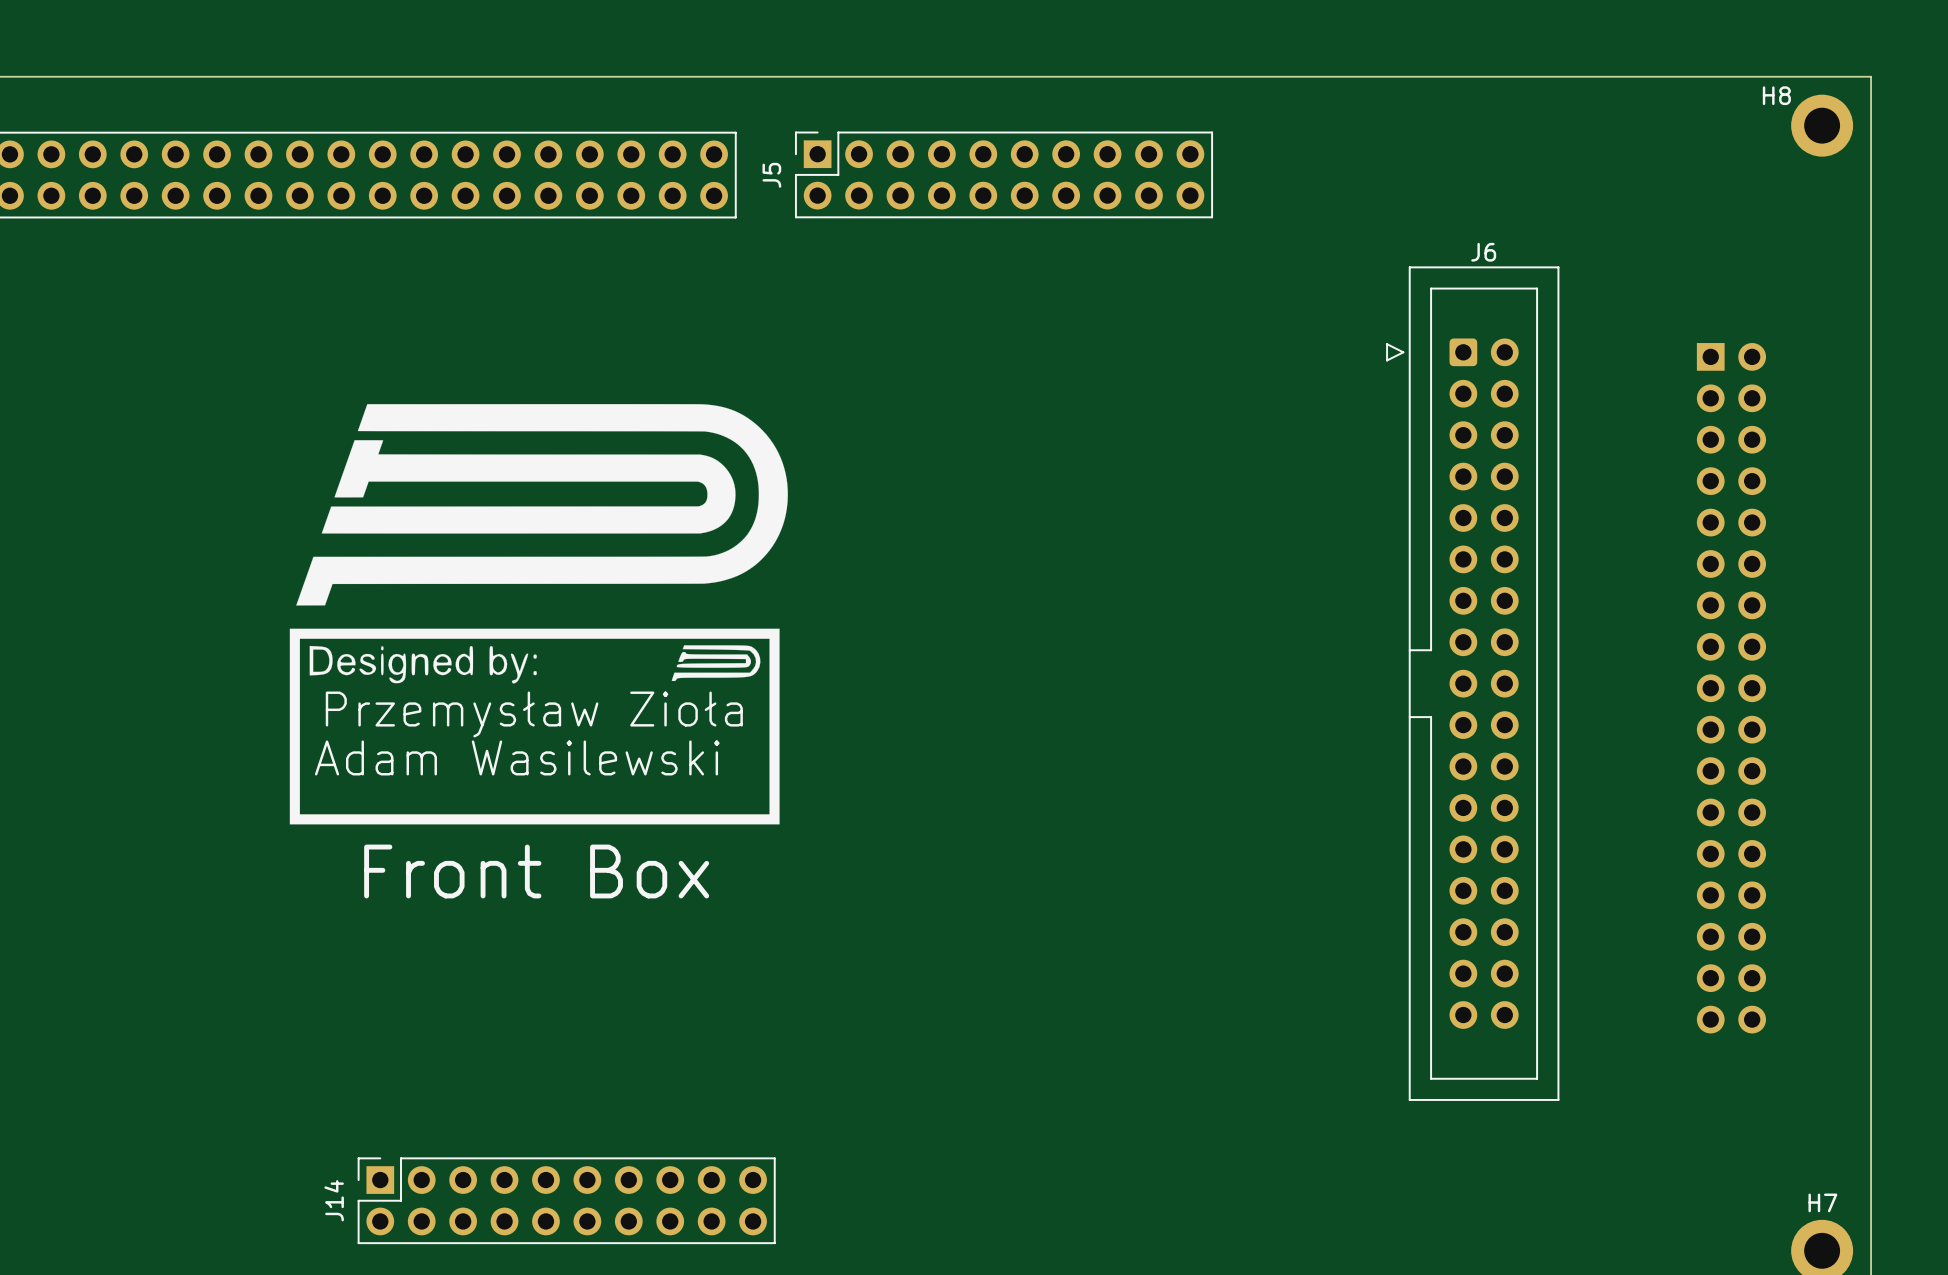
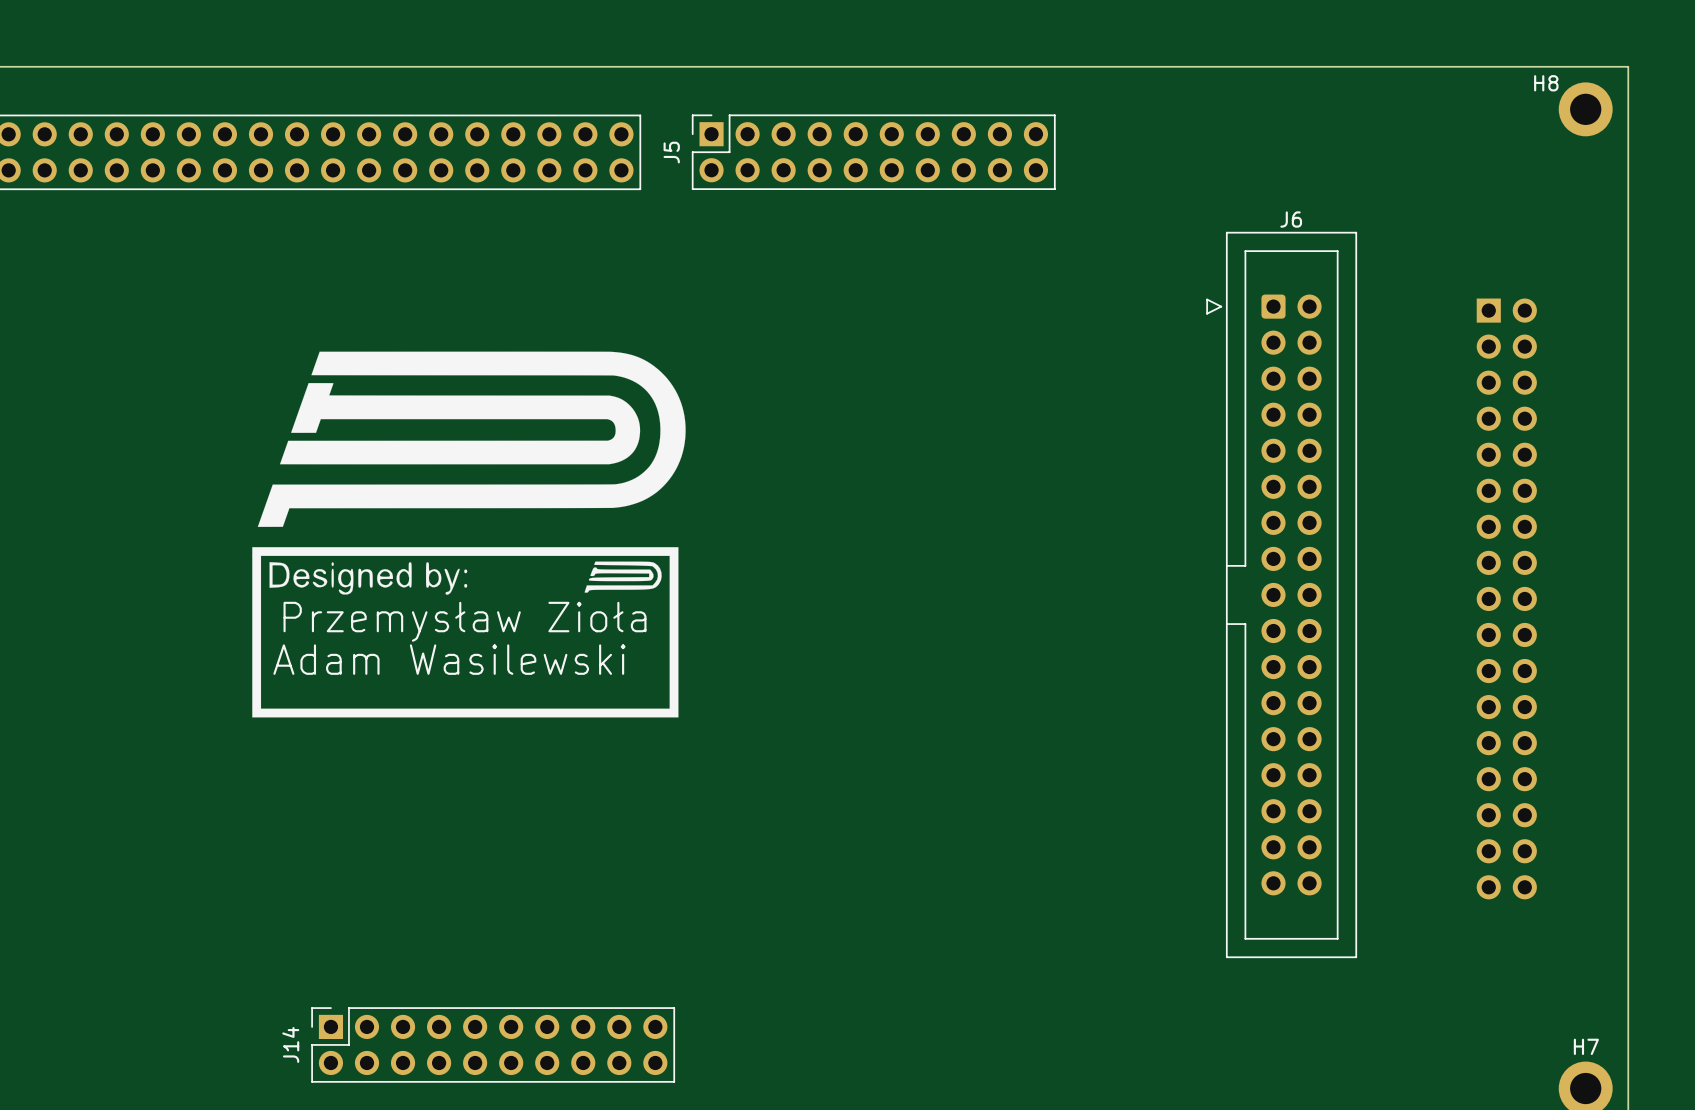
drawing shape: [289, 628, 780, 899] -> [252, 547, 679, 718]

